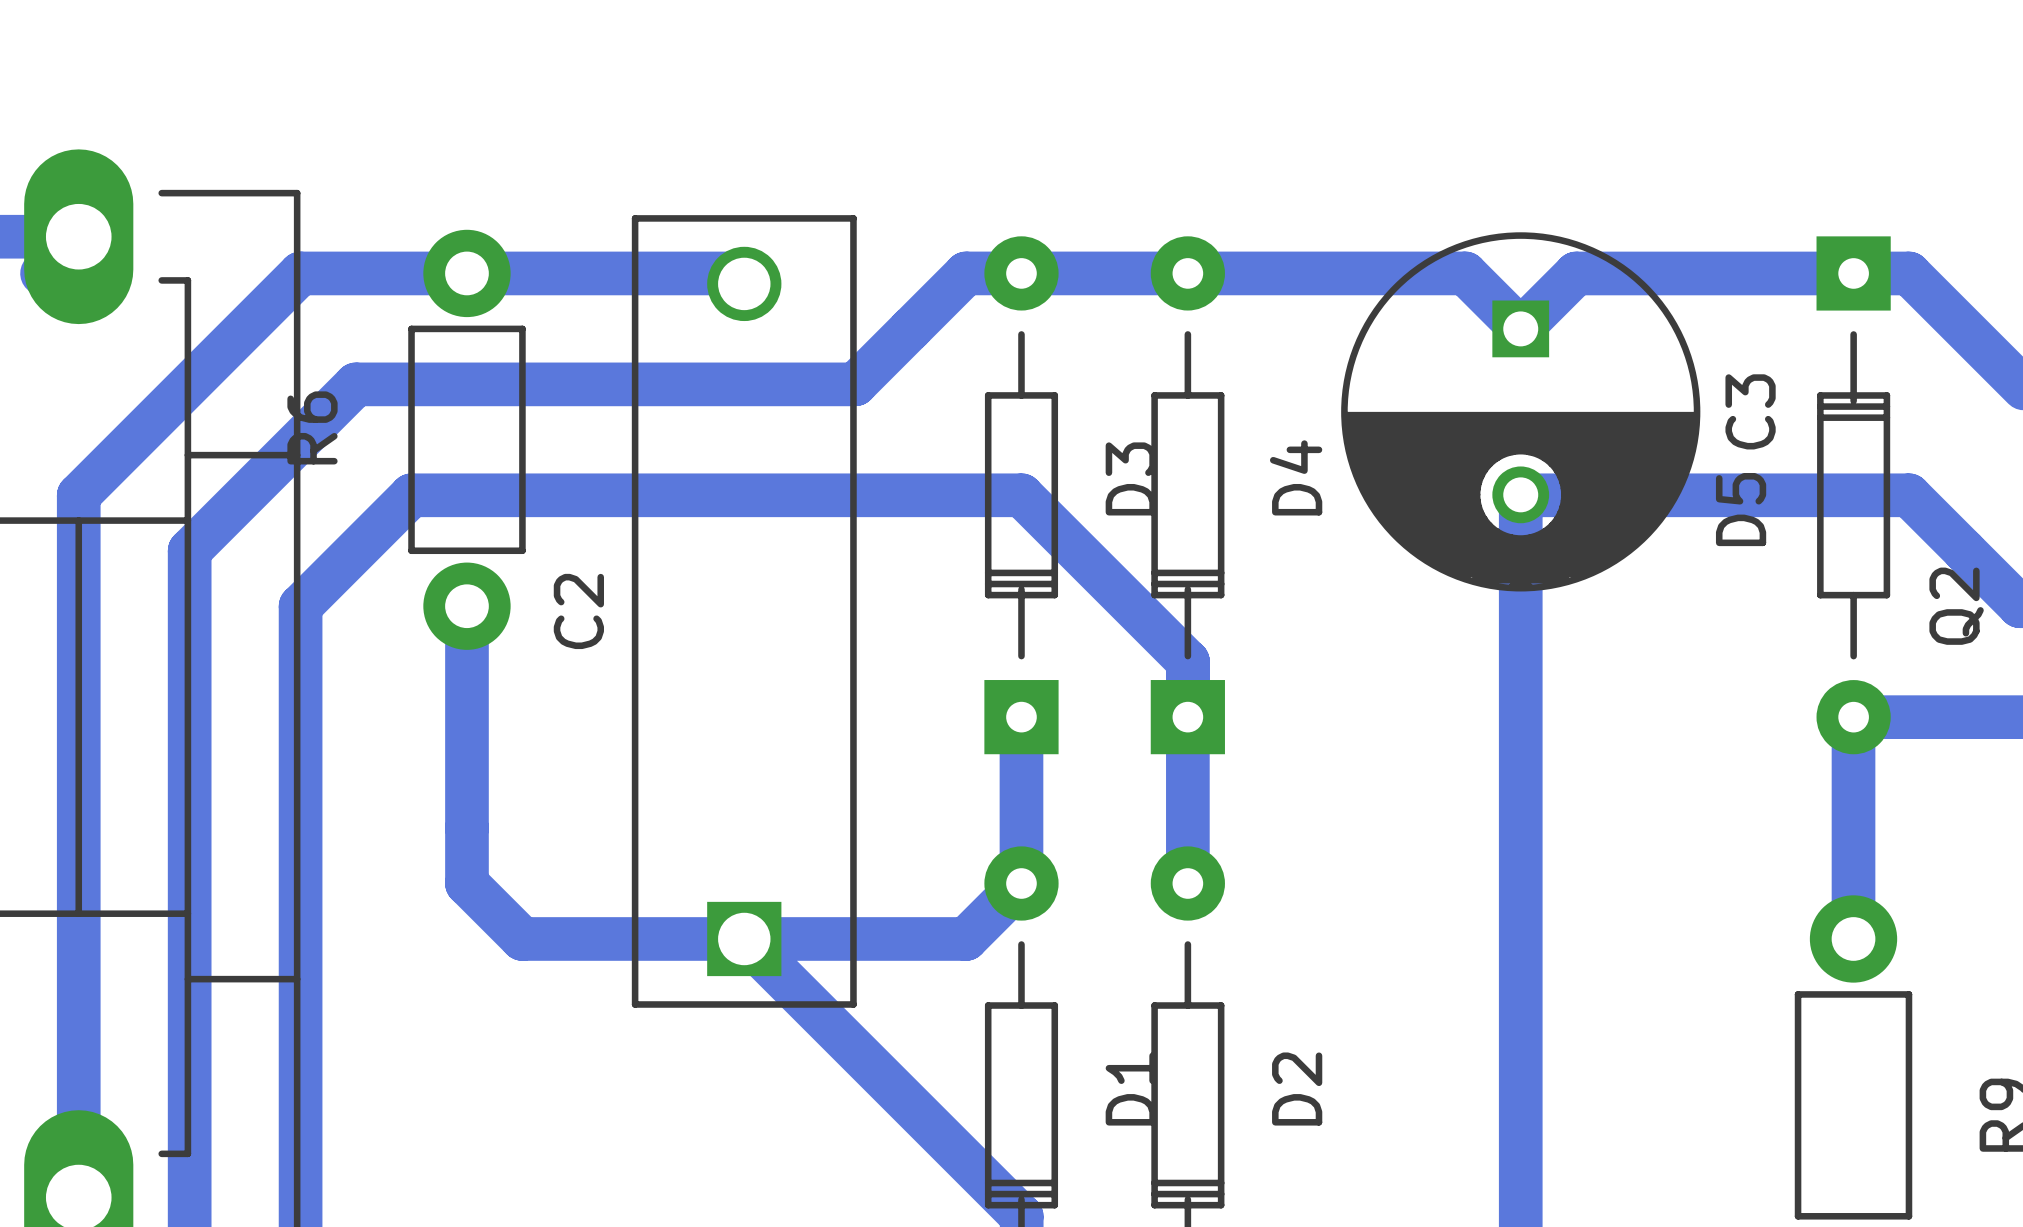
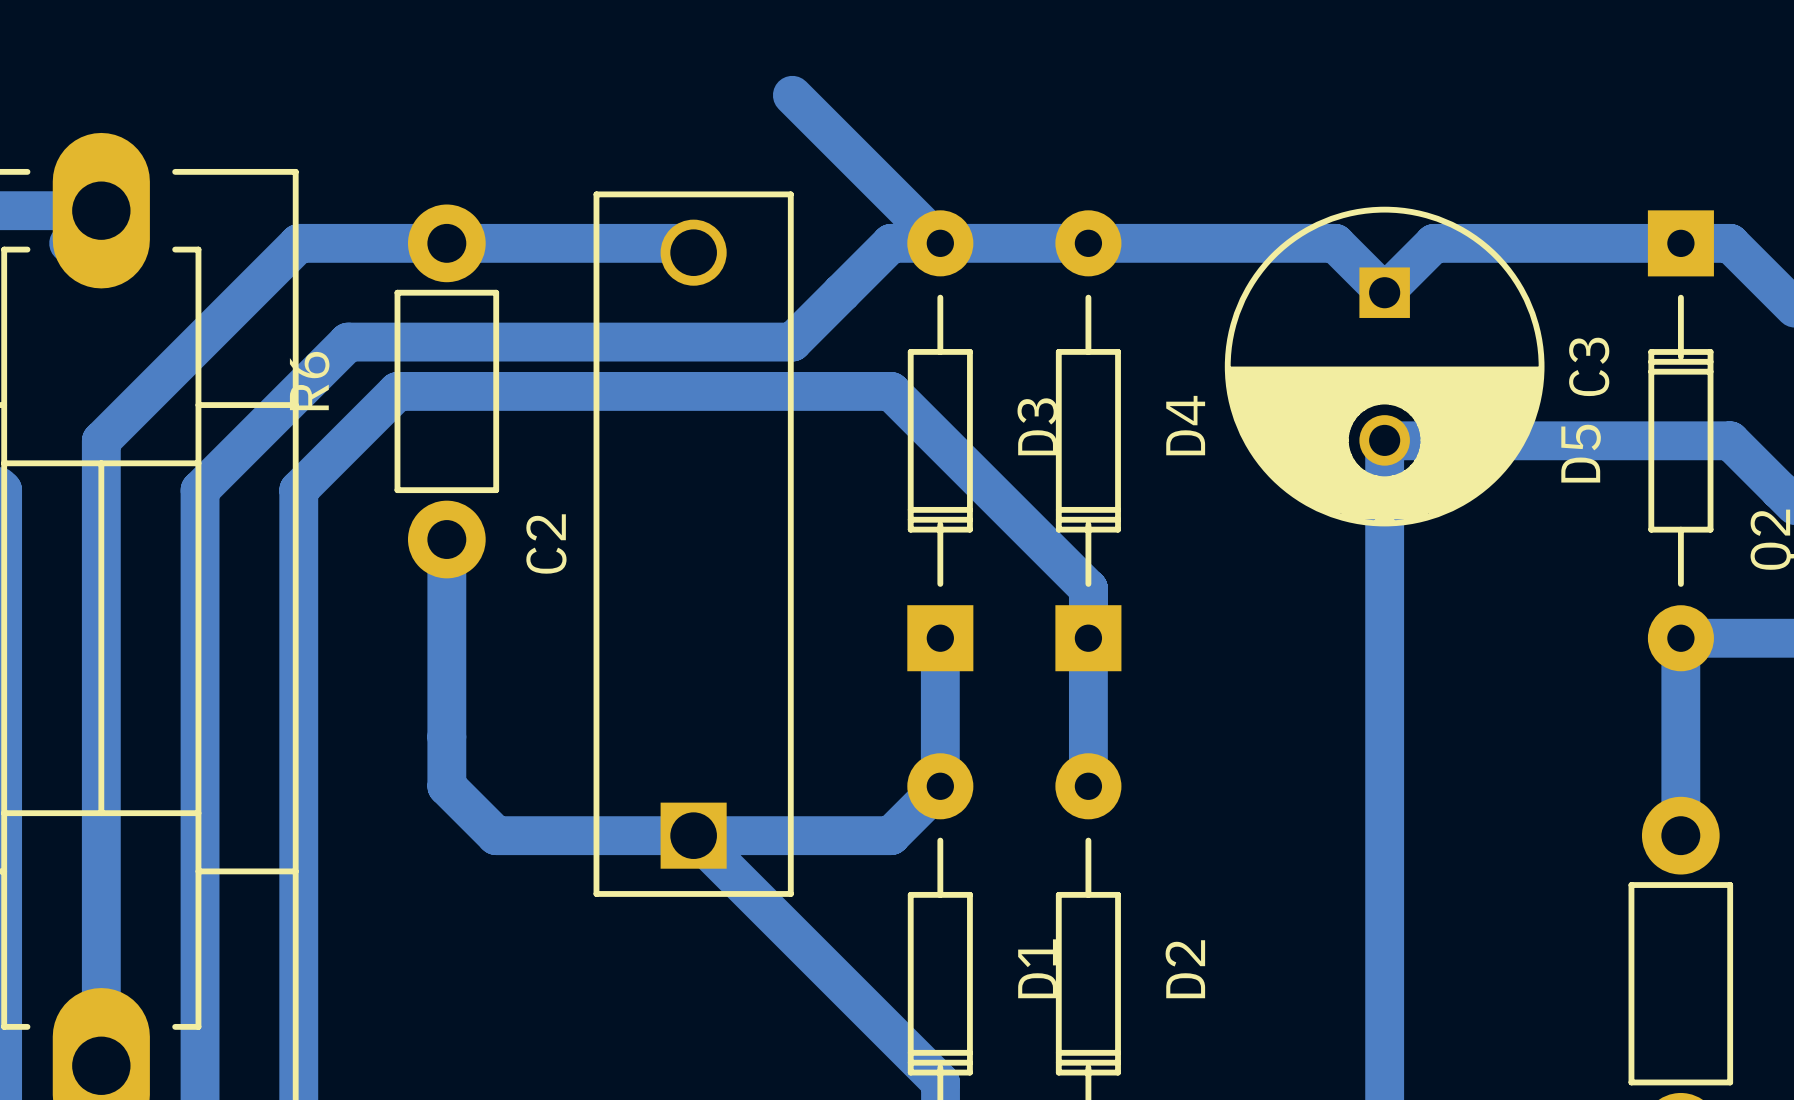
bottom track: none -> (792, 95) (940, 243)
bottom track: (1021, 495) (411, 495) (300, 606) -> (940, 440) (891, 391) (397, 391) (298, 490) (298, 539)

